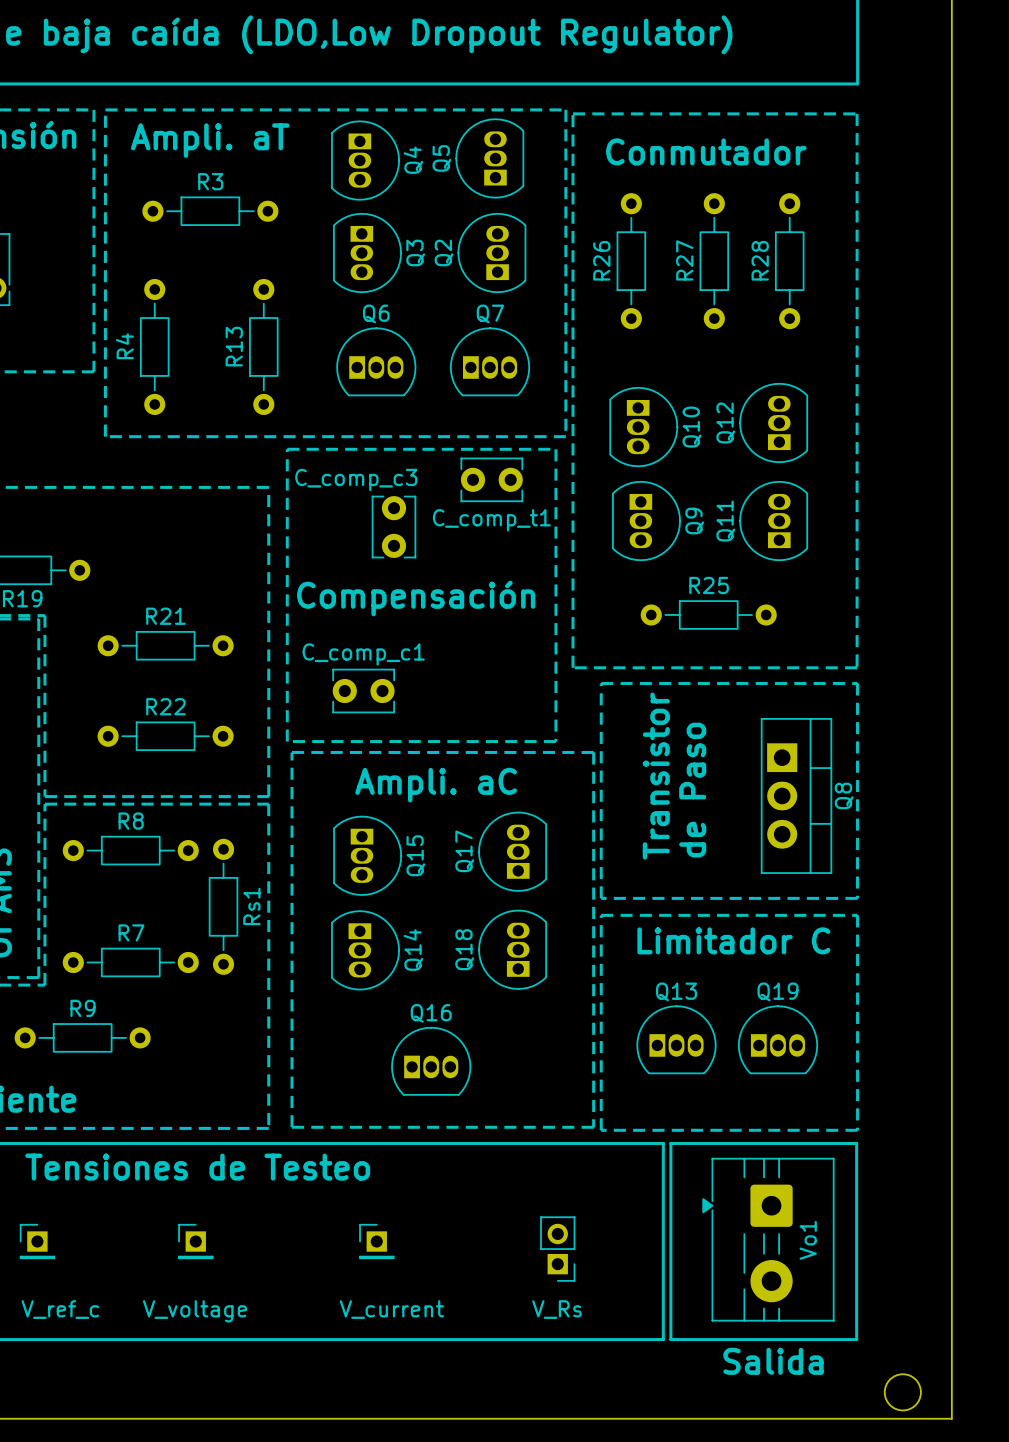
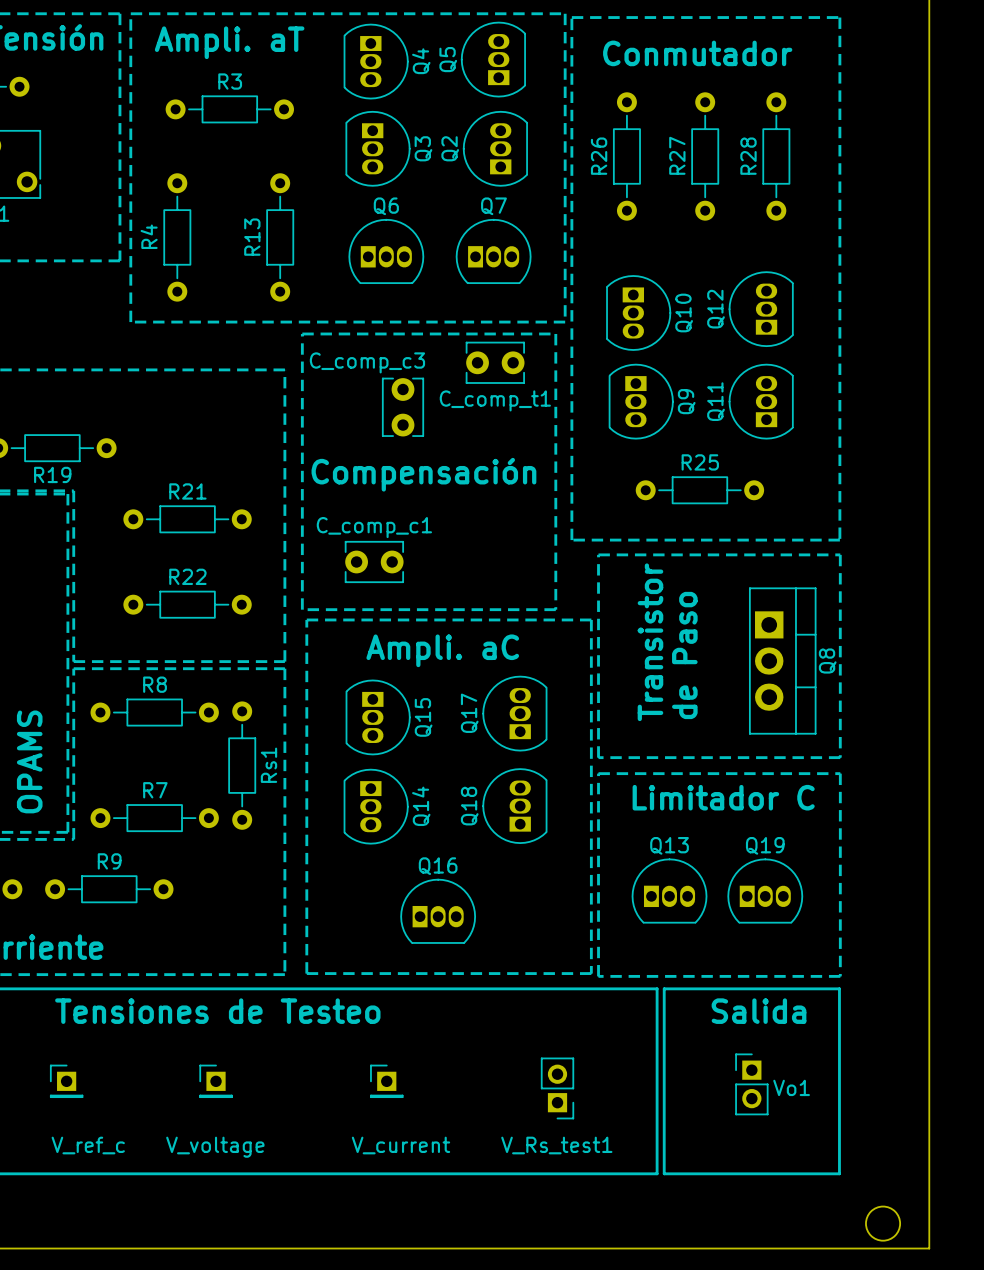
Vo1 footprint: [702, 1157, 835, 1322] -> [735, 1053, 769, 1116]
V_Rs name: V_Rs (557, 1309) -> V_Rs_test1 (556, 1145)
text position: Salida (773, 1361) -> Salida (759, 1011)

